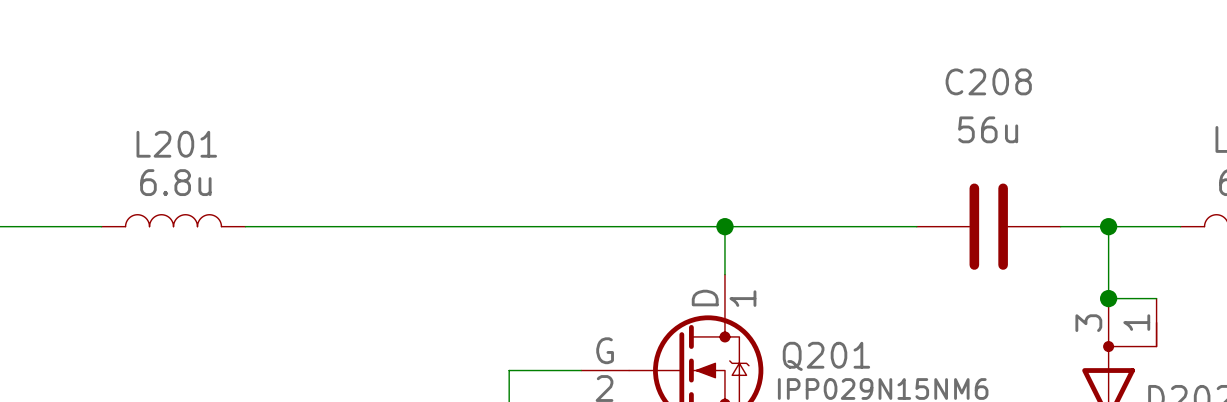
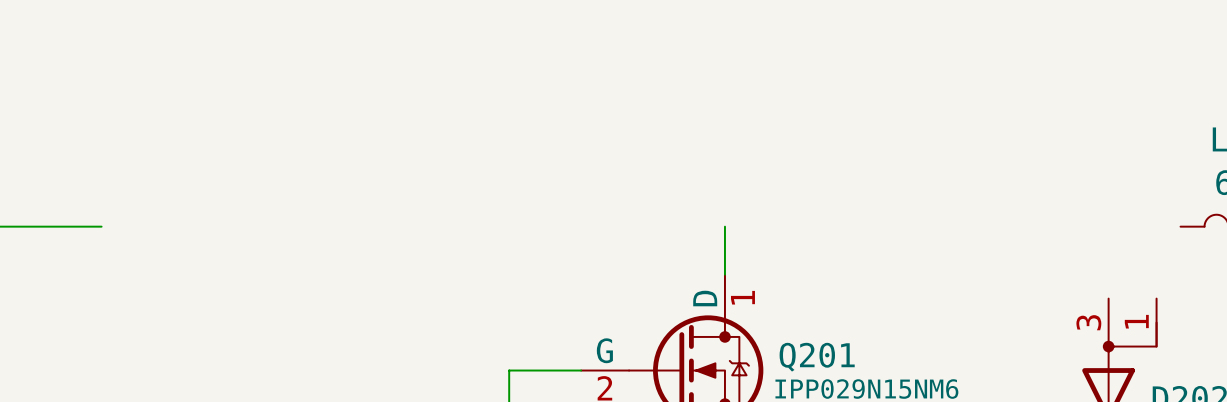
L201: 6.8u (173, 220) -> none
wire: (245, 226) (916, 226) -> none
junction: (724, 226) -> none
C208: 56u (988, 226) -> none
wire: (1060, 226) (1180, 226) -> none
wire: (1108, 226) (1108, 298) (1156, 298) -> none
junction: (1108, 226) -> none
junction: (1108, 298) -> none

